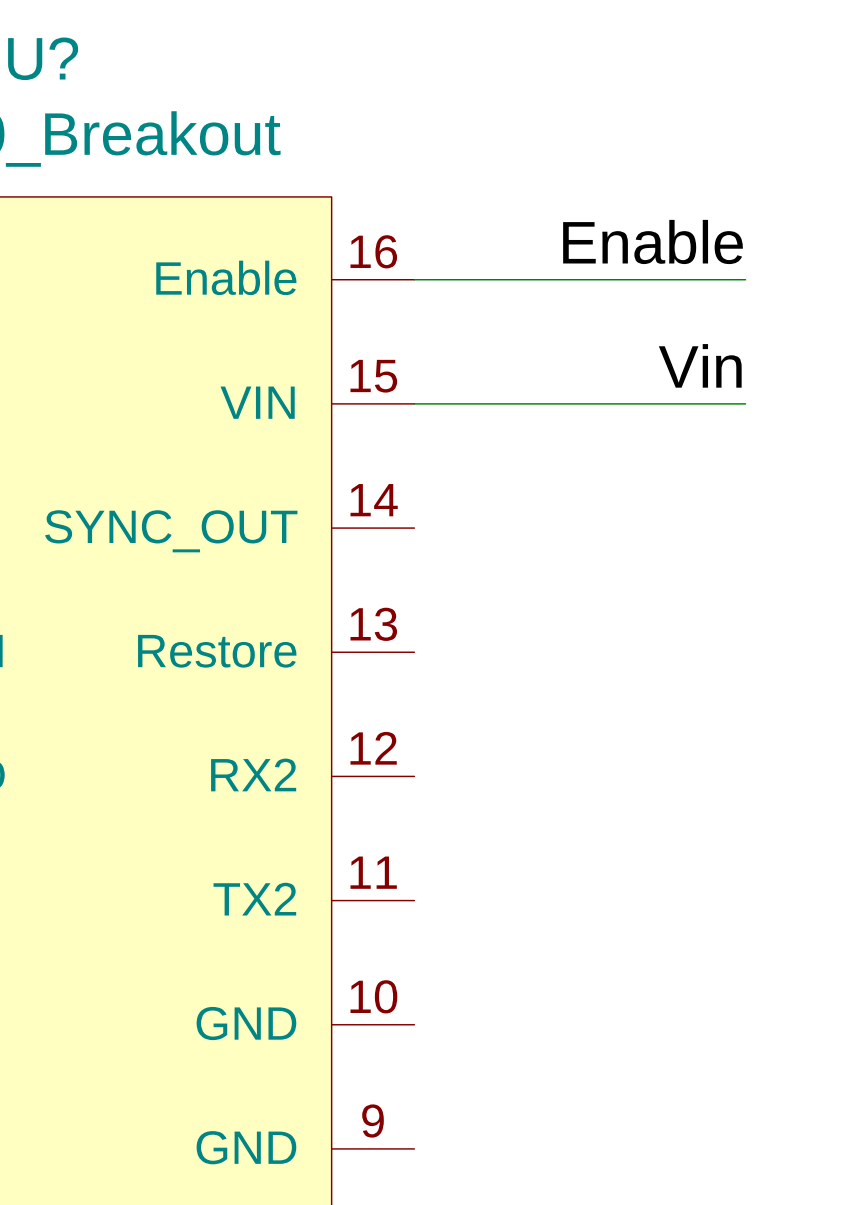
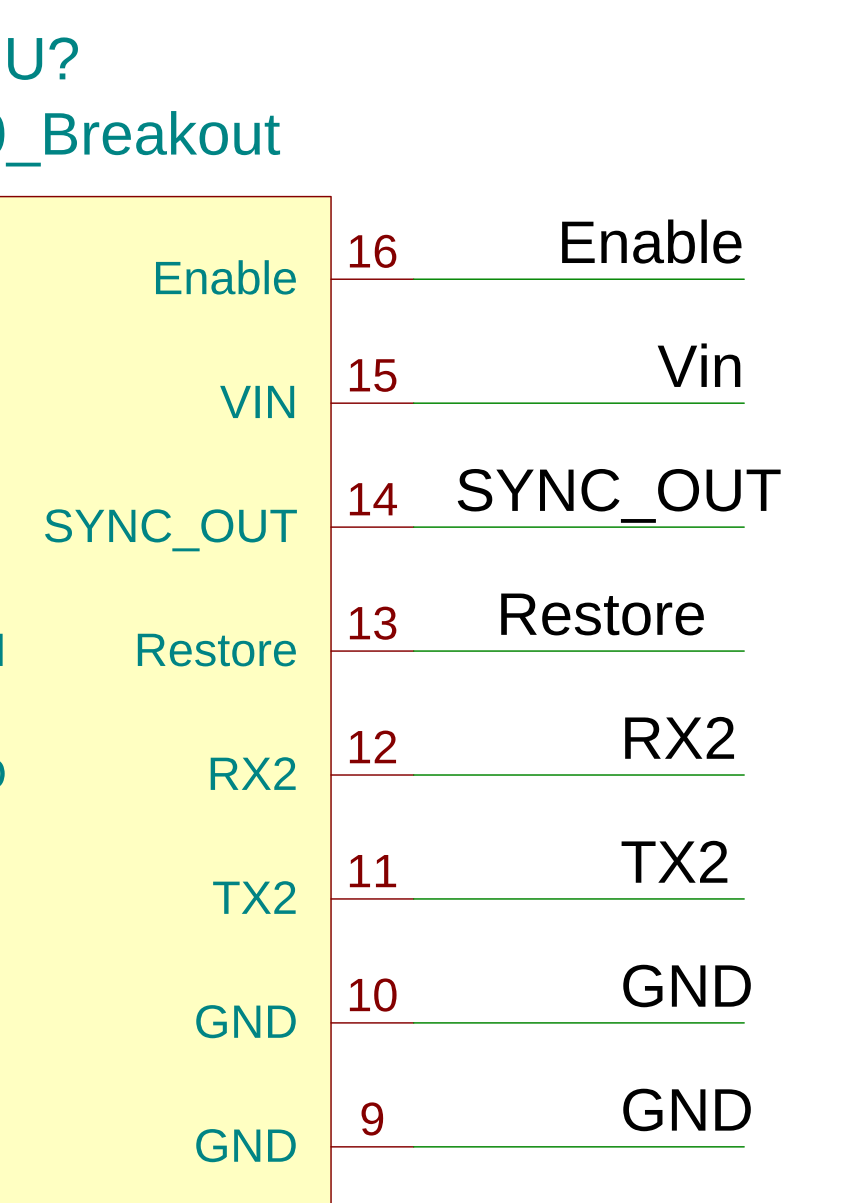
label: none -> SYNC_OUT (619, 495)
wire: none -> (413, 527) (744, 527)
label: none -> Restore (602, 614)
wire: none -> (413, 651) (744, 651)
label: none -> RX2 (679, 737)
wire: none -> (413, 775) (744, 775)
label: none -> TX2 (674, 861)
wire: none -> (413, 898) (744, 898)
label: none -> GND (687, 986)
wire: none -> (413, 1022) (744, 1022)
label: none -> GND (687, 1109)
wire: none -> (413, 1146) (744, 1146)

